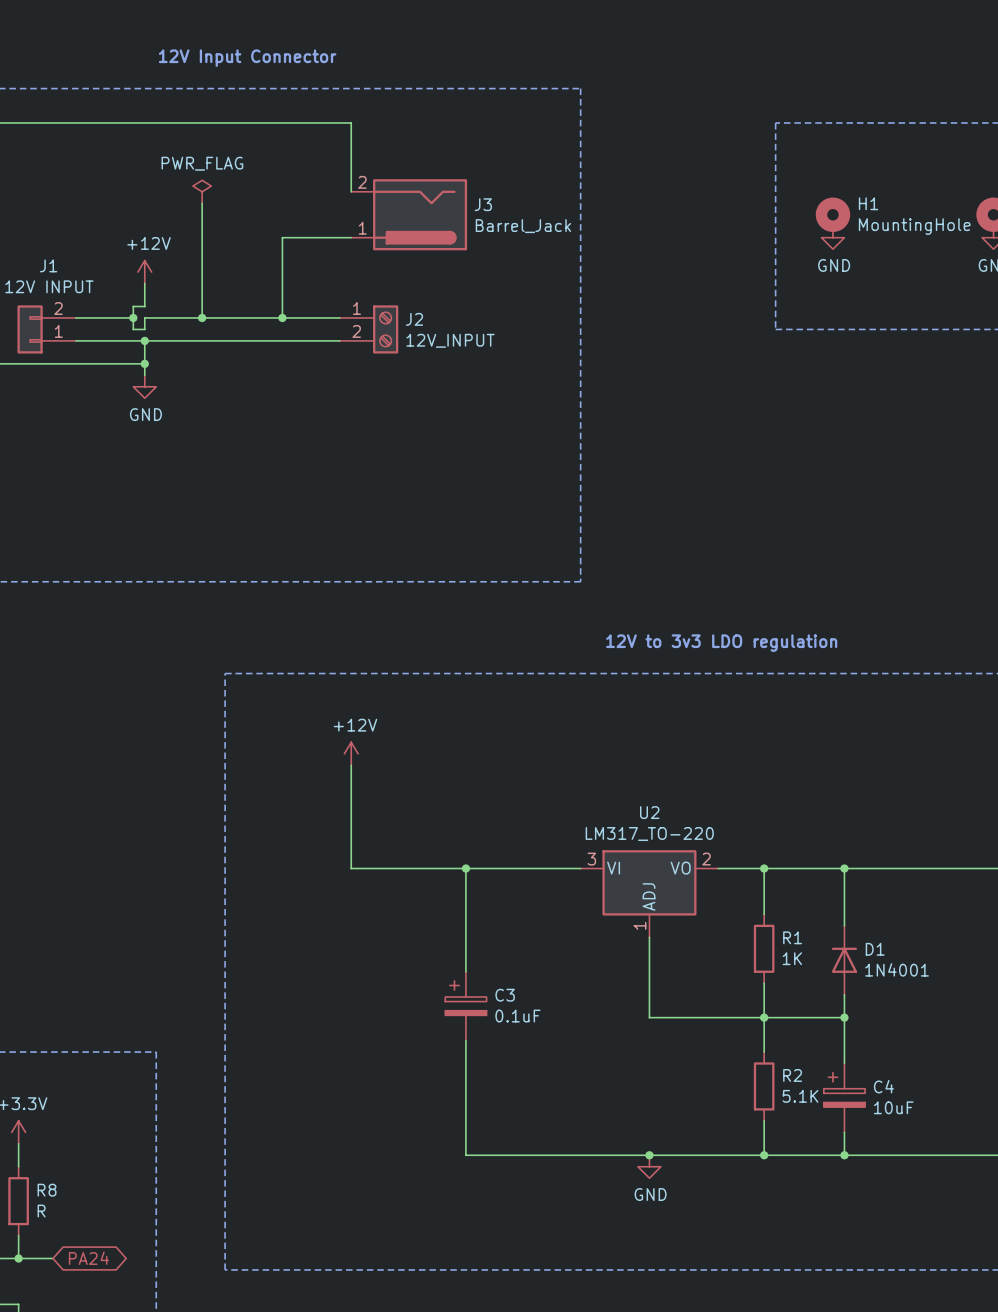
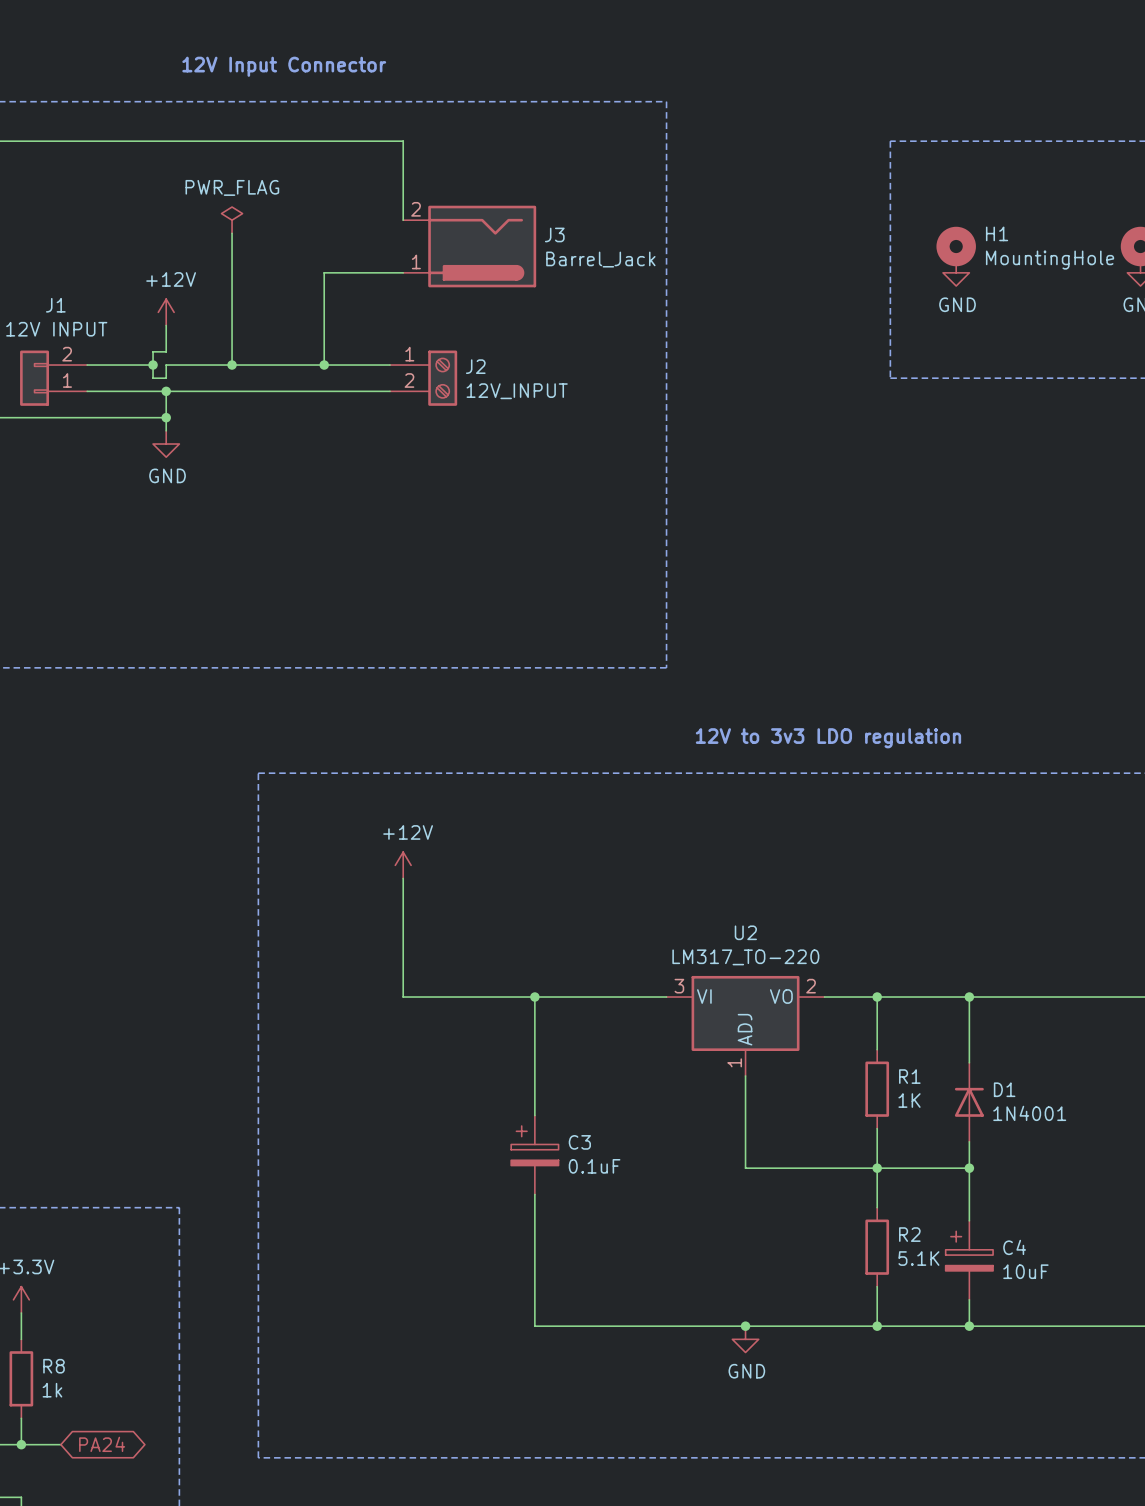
R8 value: R (41, 1211) -> 1k (52, 1390)

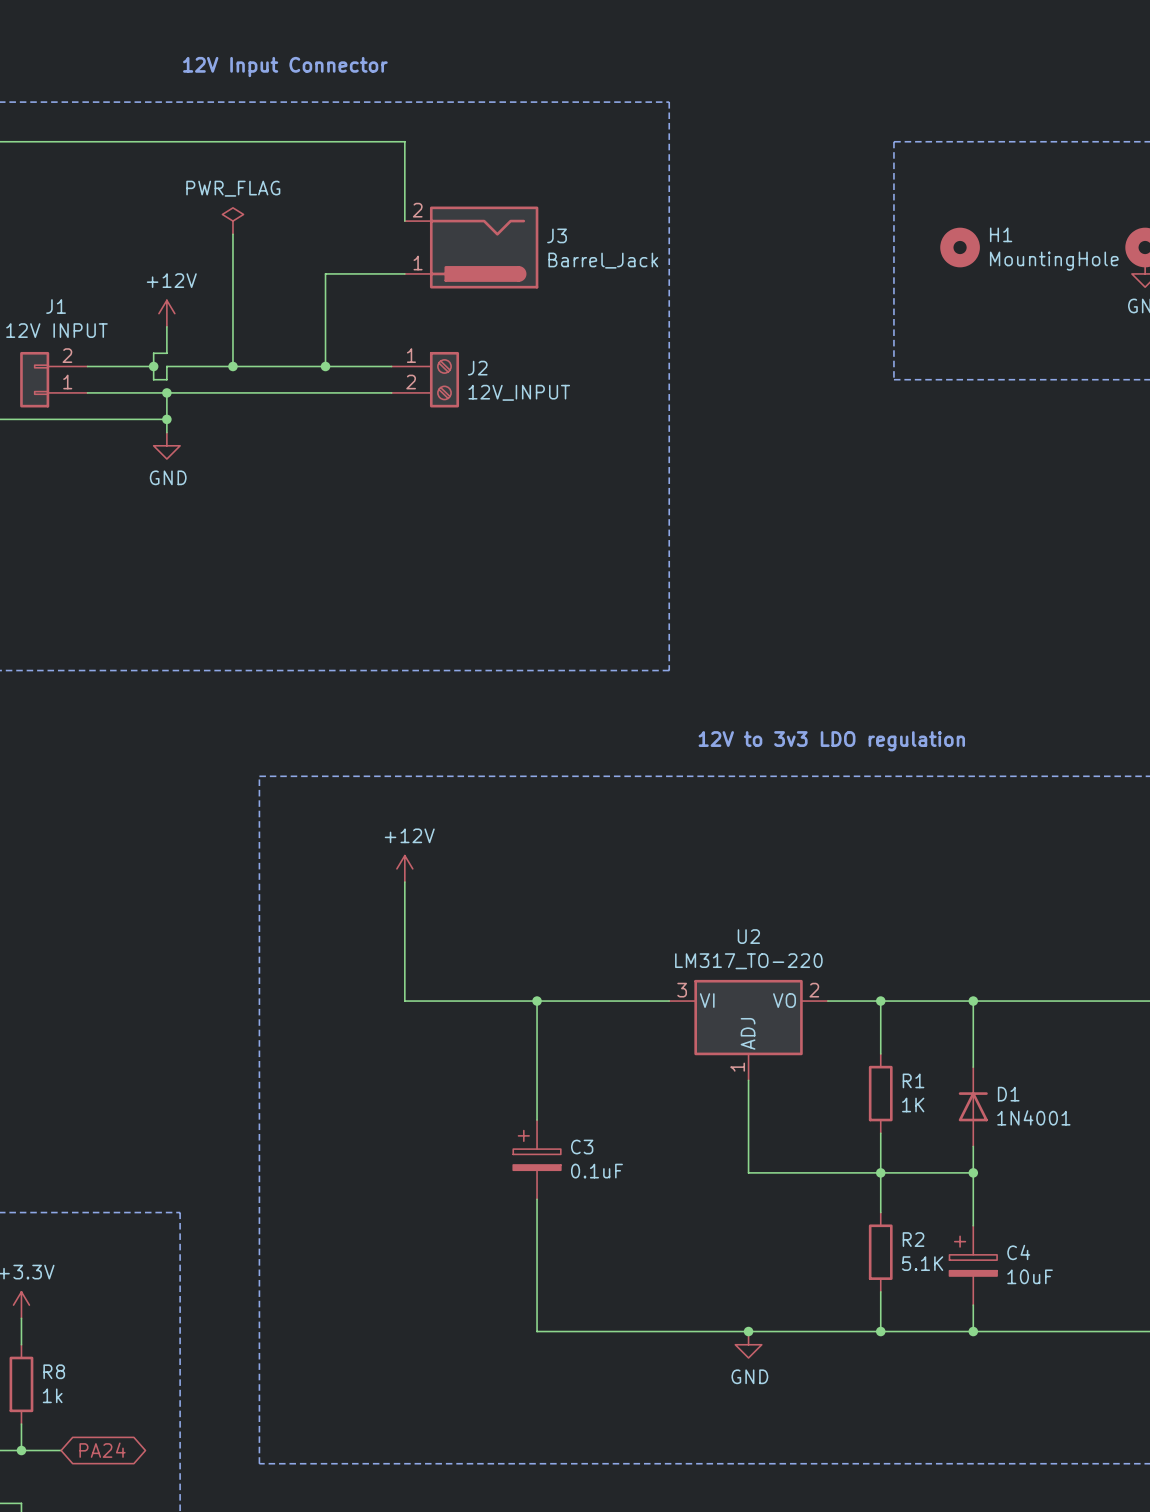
power symbol: GND (956, 272) -> none

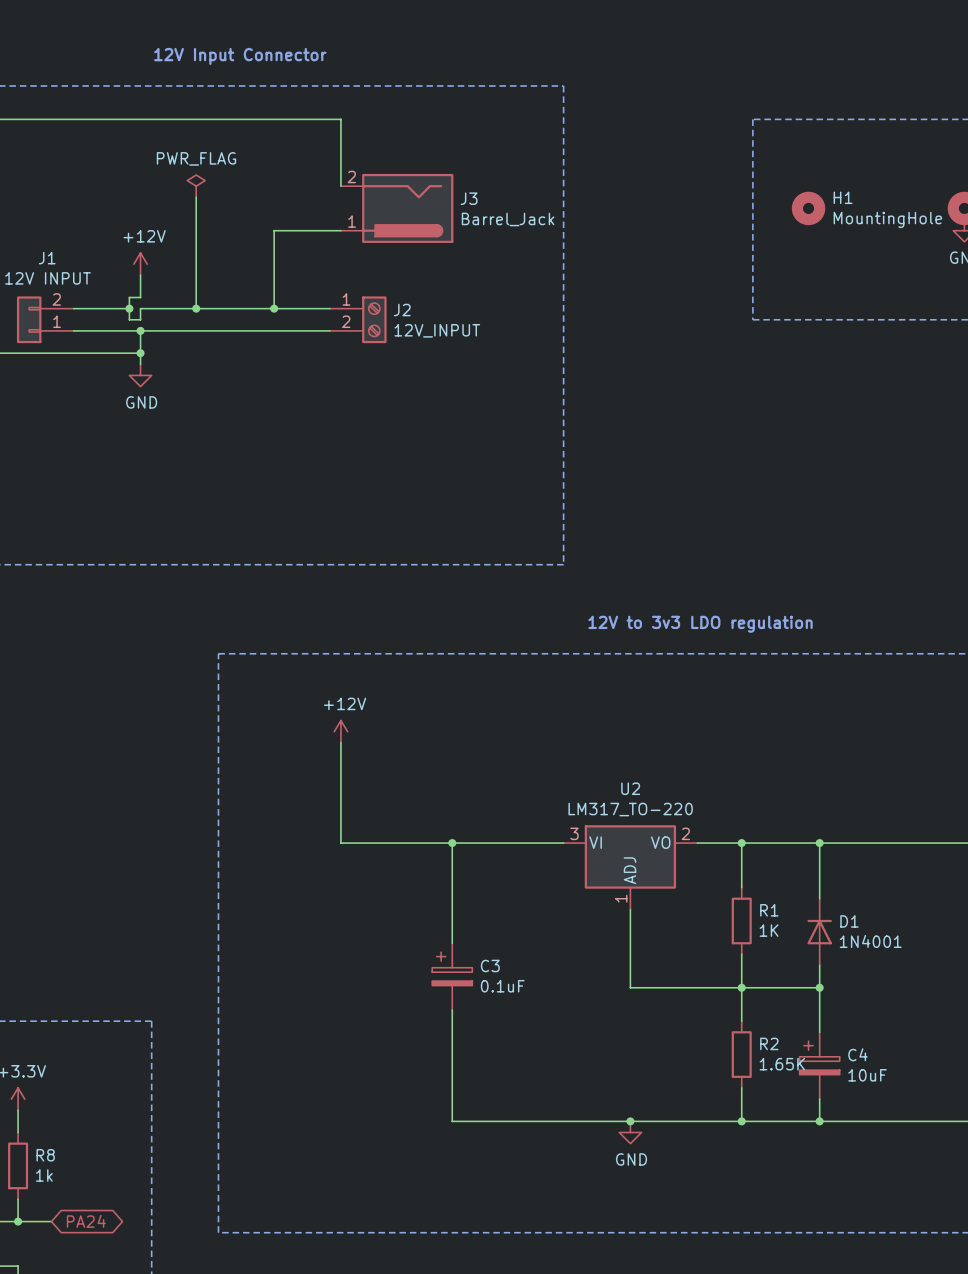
R2 value: 5.1K (922, 1263) -> 1.65K (782, 1064)

